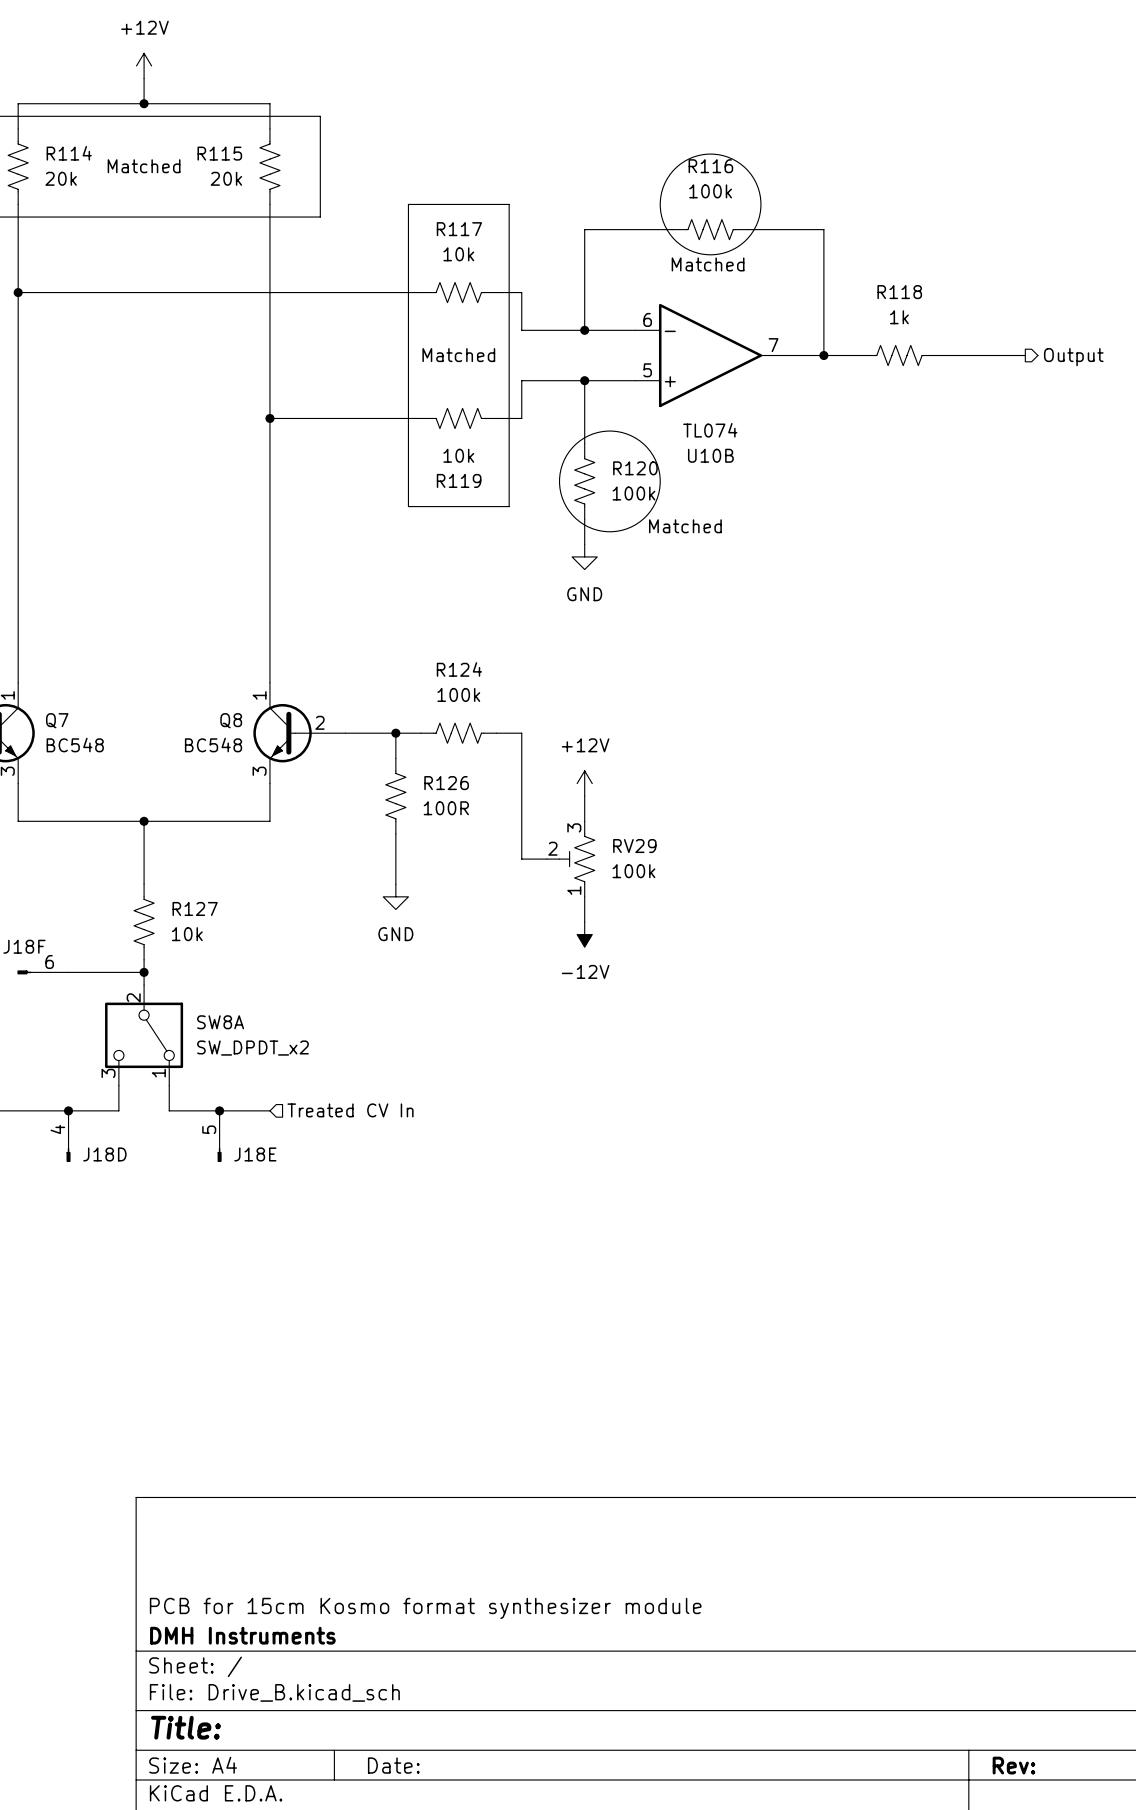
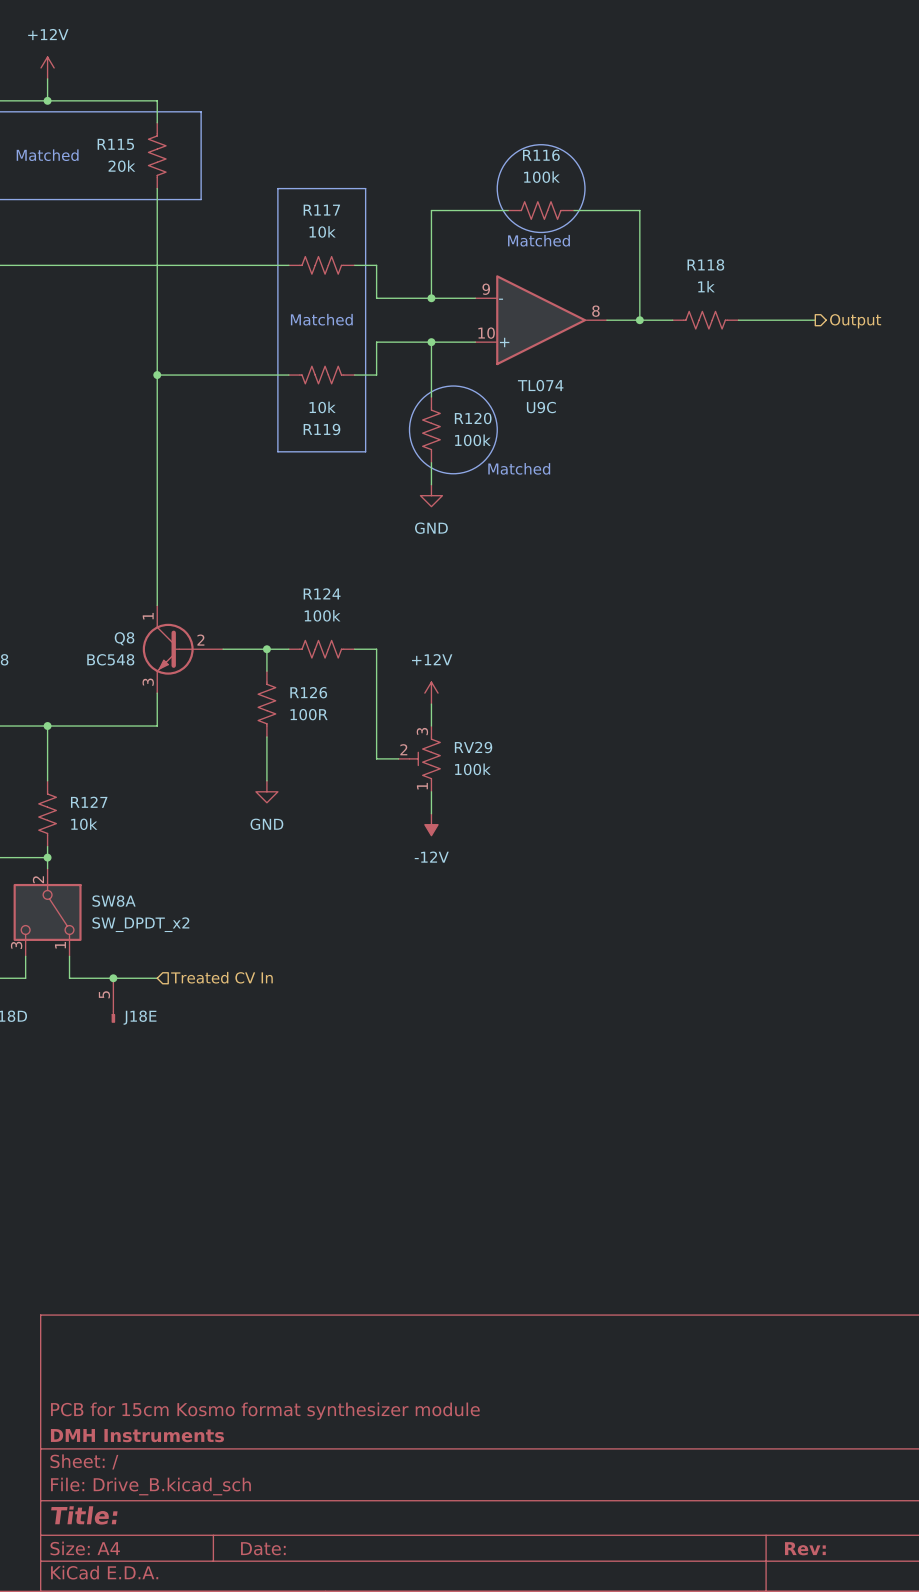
U10B pin number: 6 (647, 319) -> 9 (486, 289)
U10B pin number: 7 (773, 345) -> 8 (595, 311)
U10B pin number: 5 (647, 370) -> 10 (486, 333)
U10B name: U10B (710, 455) -> U9C (541, 407)

